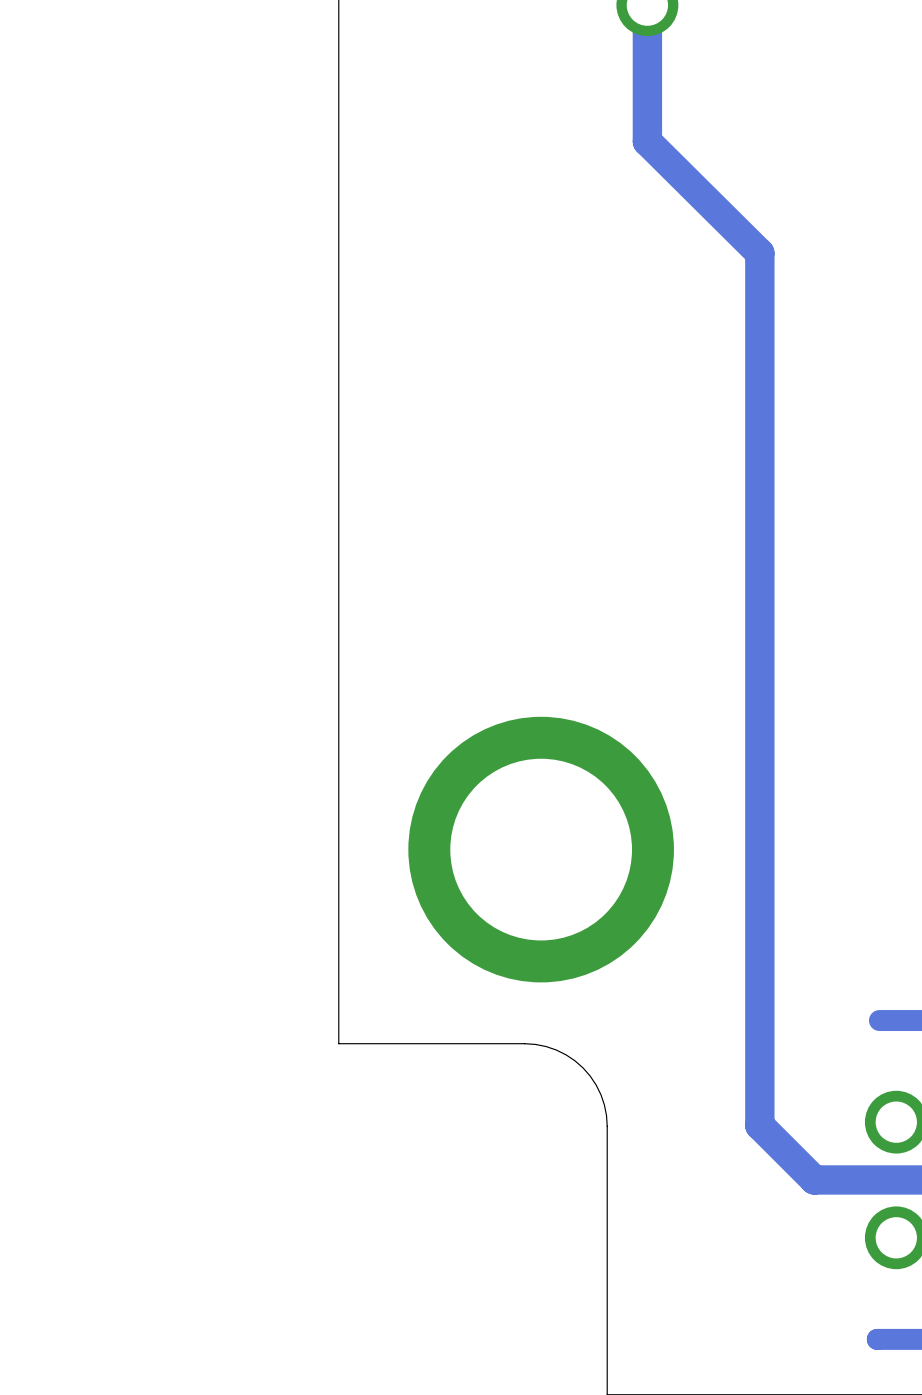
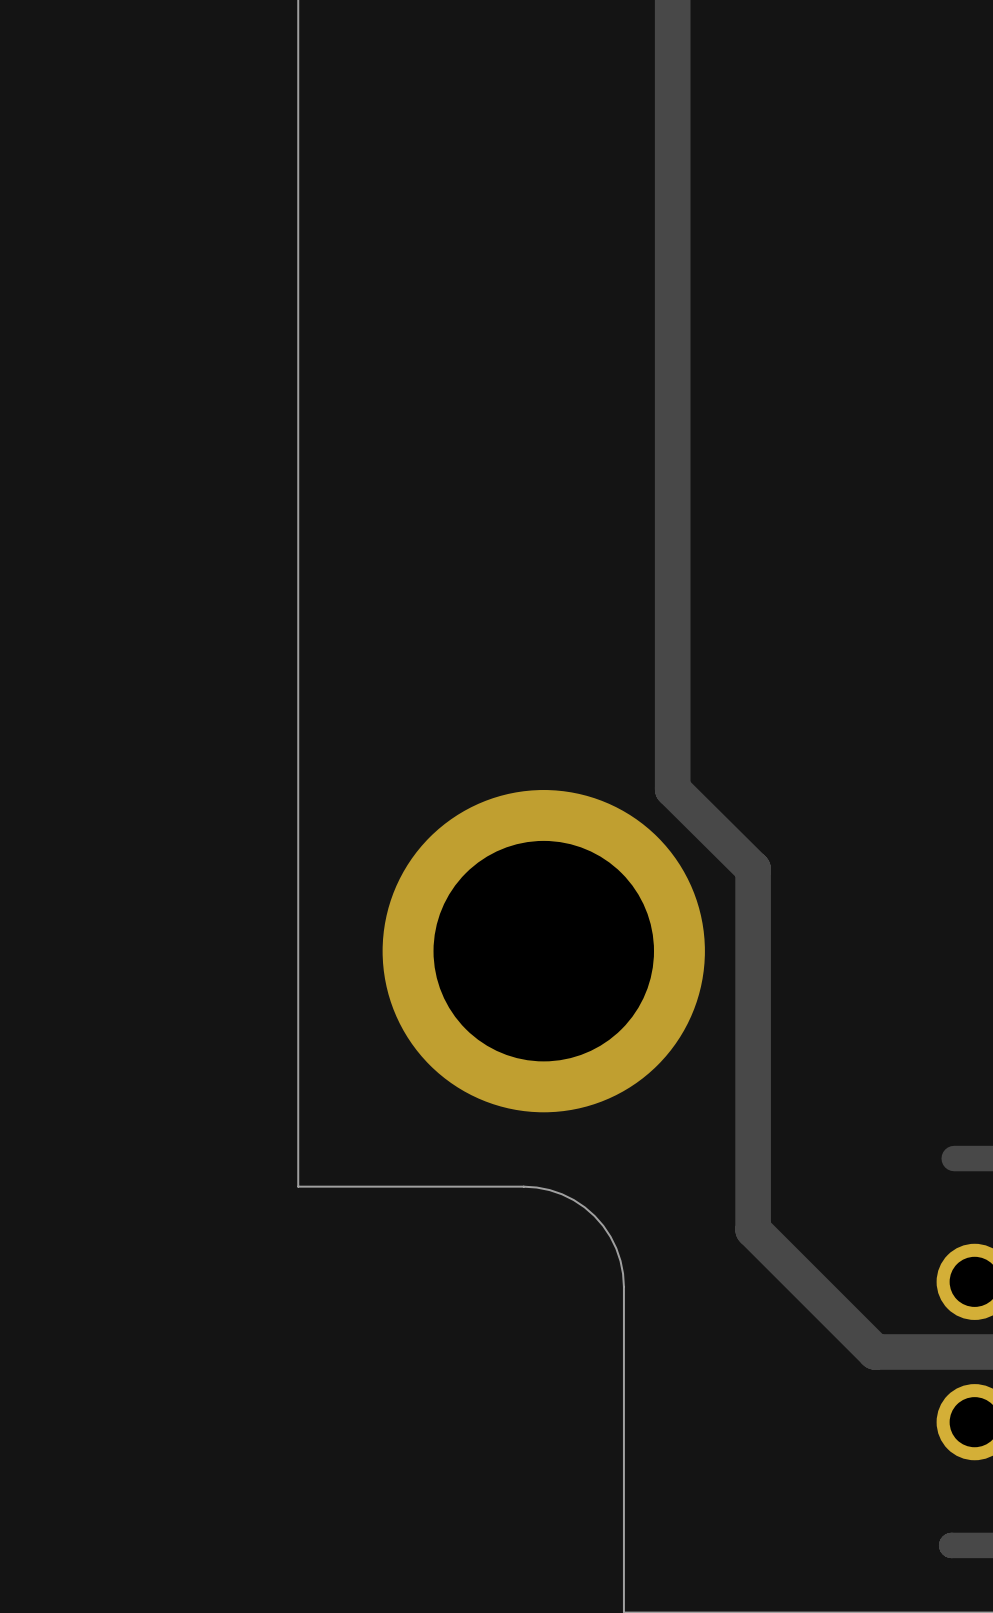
track: (647, 141) (759, 253) (759, 1125) -> (672, 91) (672, 789) (753, 869) (753, 1229) (809, 1285)

